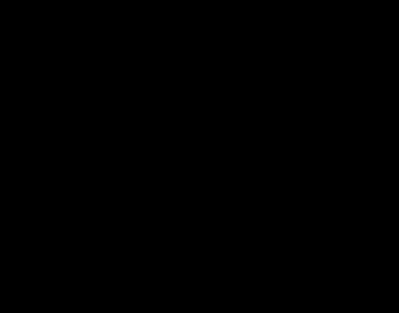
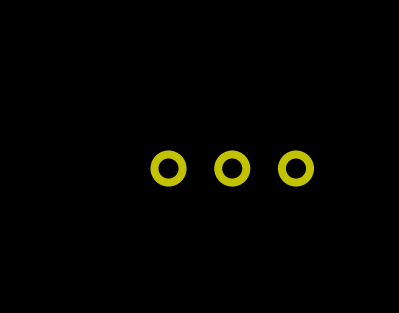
part: none -> (232, 168)

